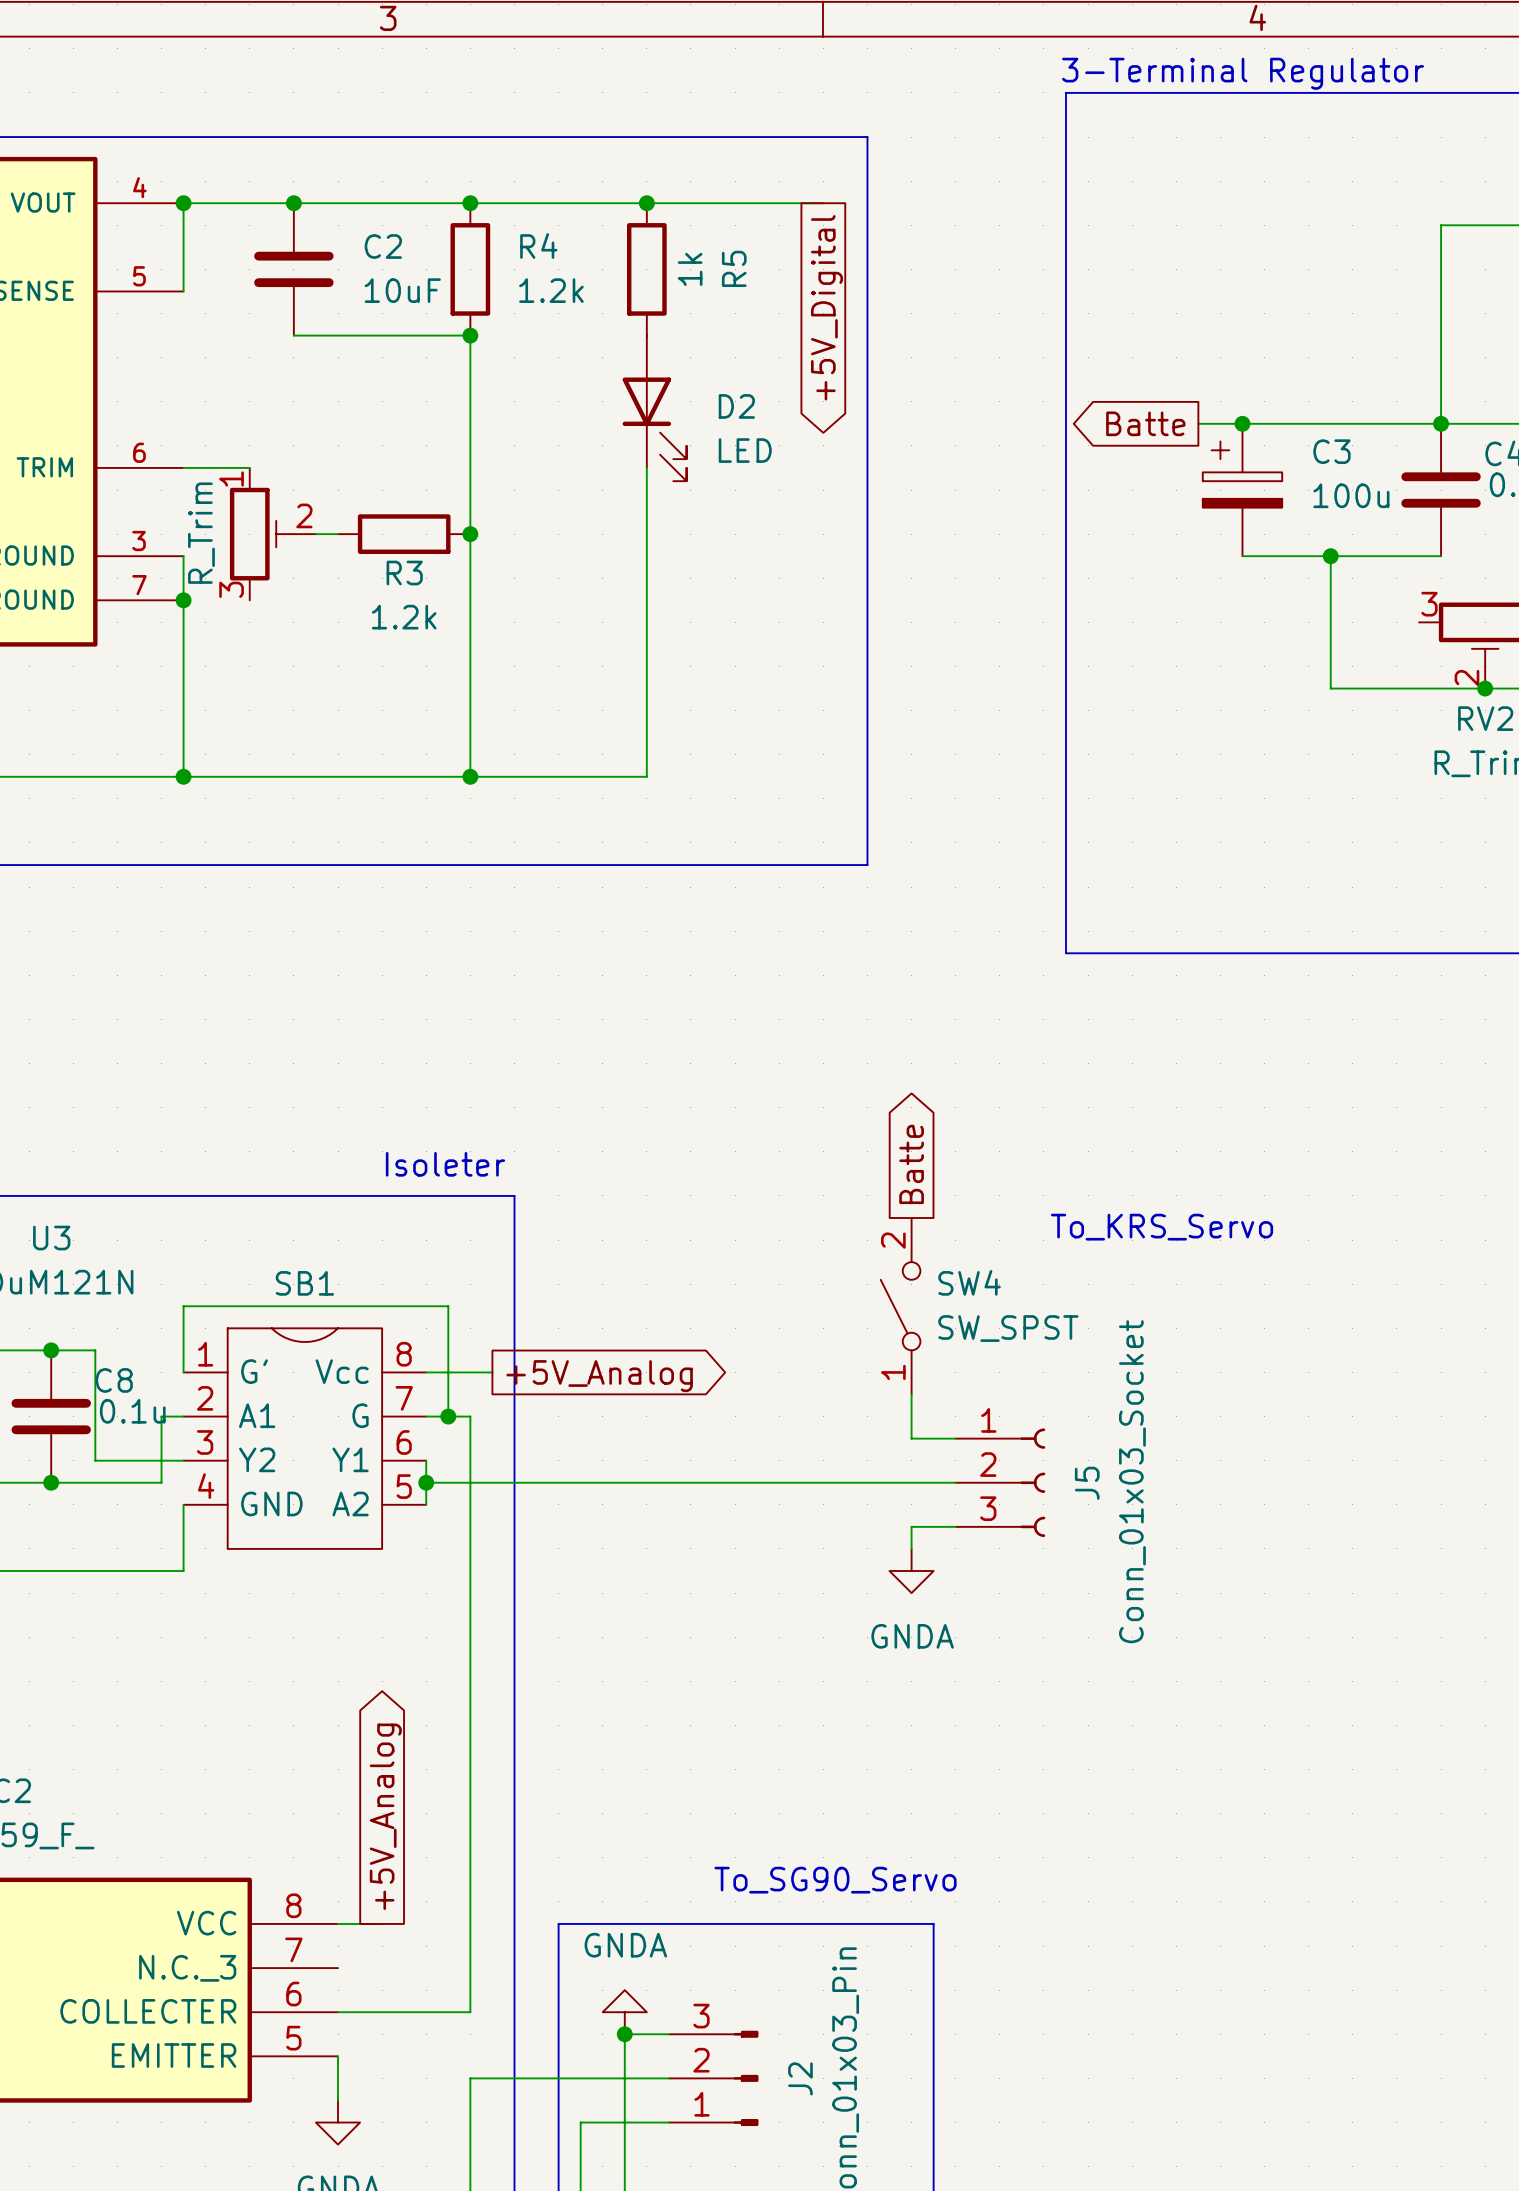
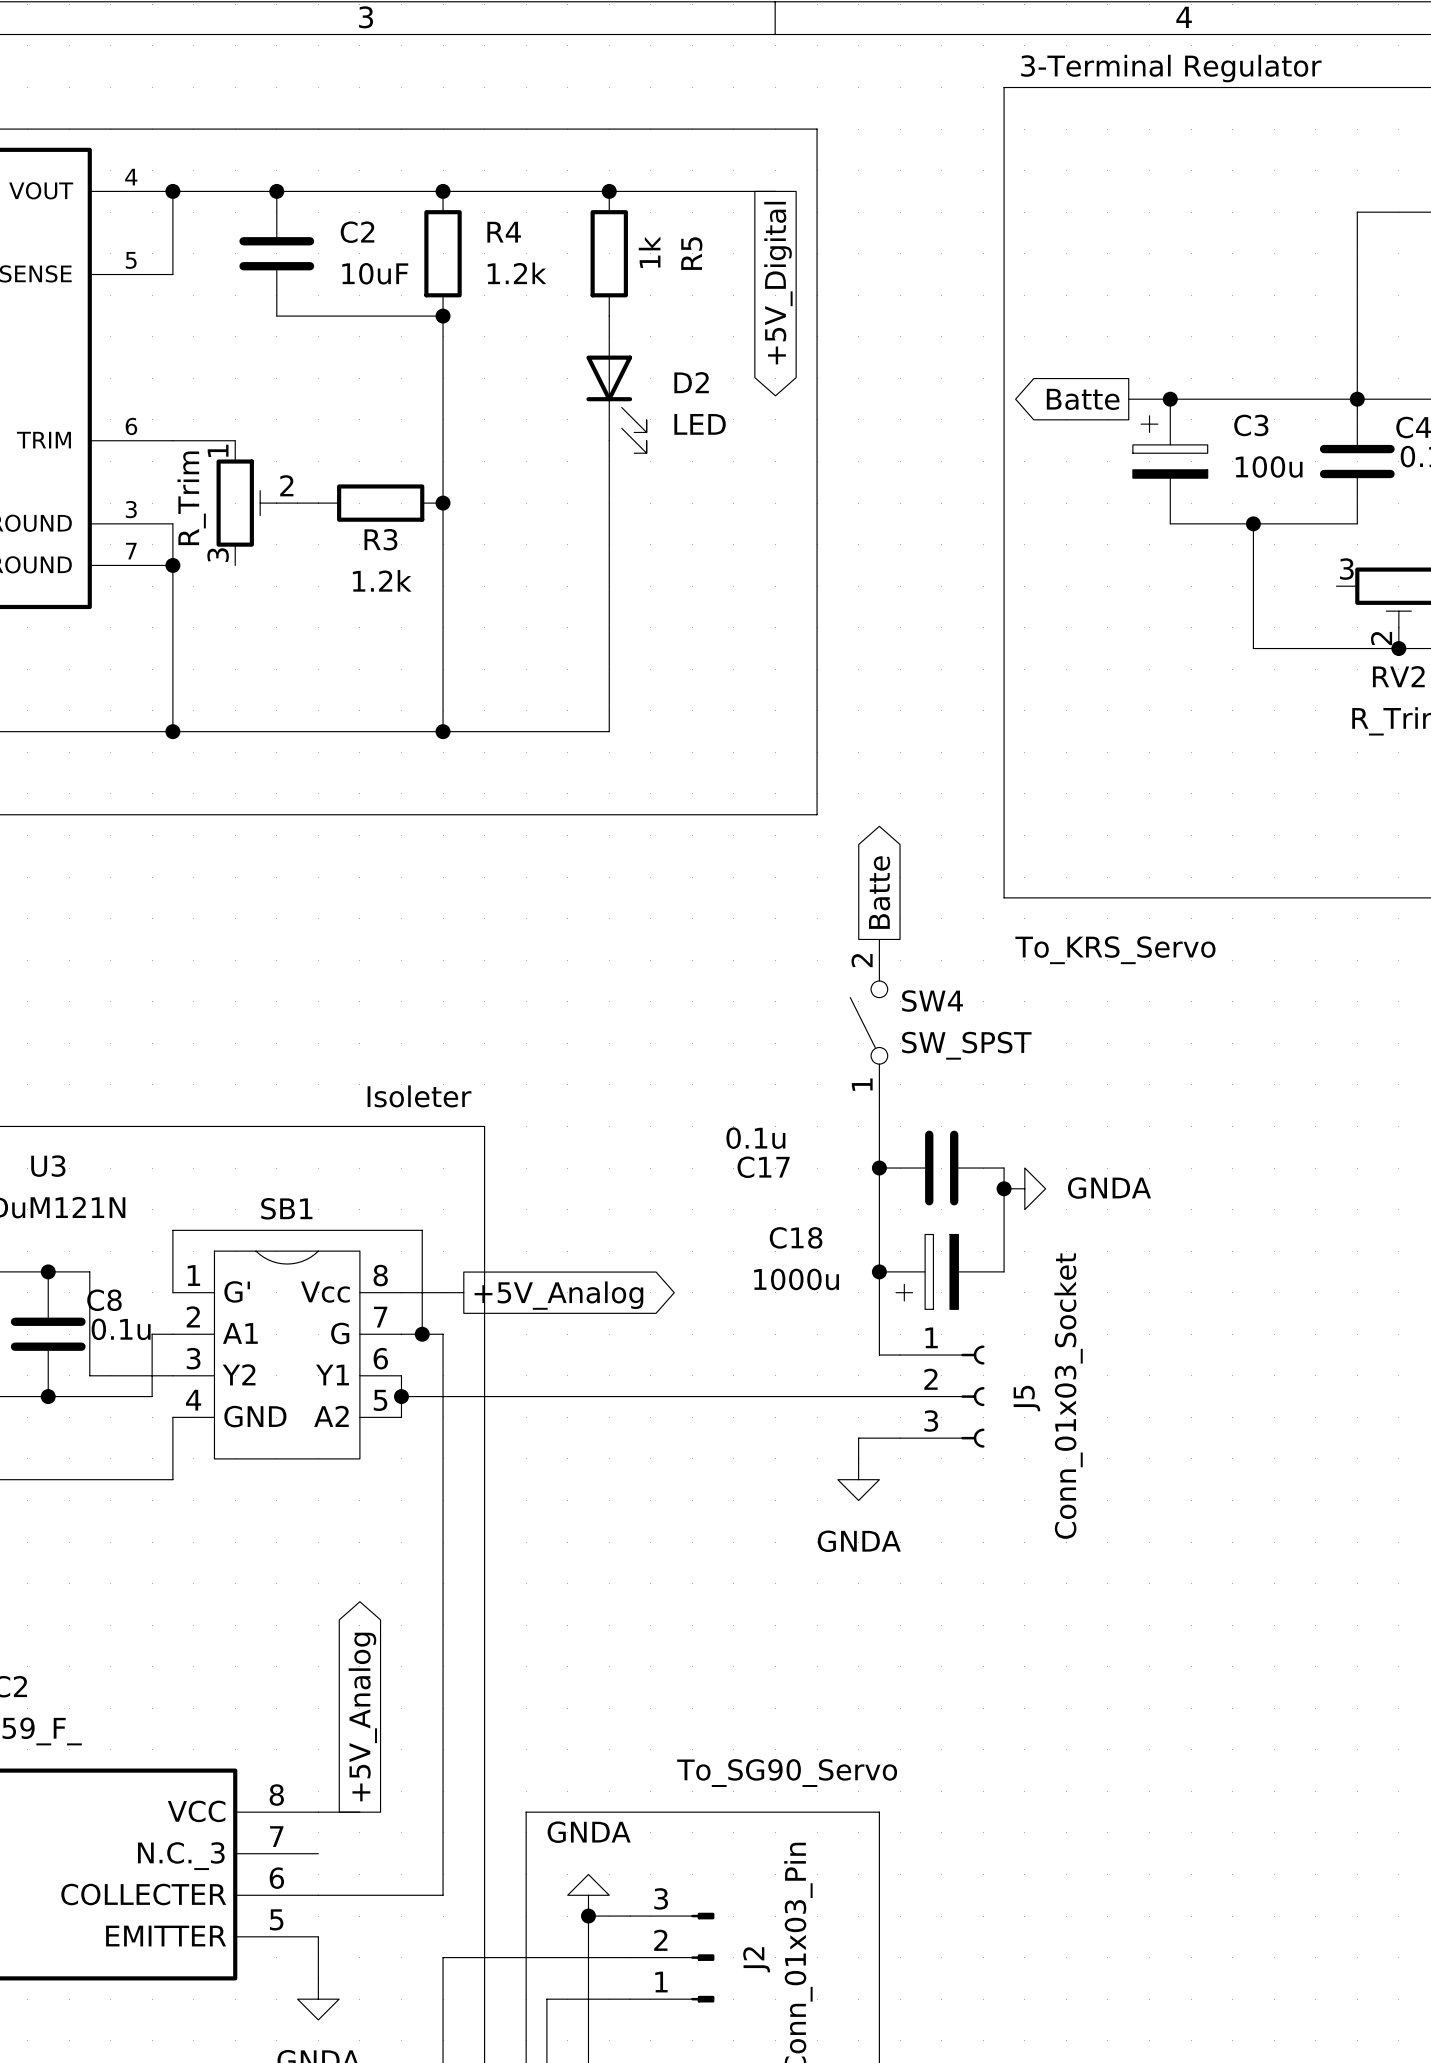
global label position: Batte (911, 1164) -> Batte (879, 892)
text position: To_KRS_Servo (1162, 1227) -> To_KRS_Servo (1115, 950)
junction: none -> (879, 1168)
C17: none -> 0.1u (941, 1168)
wire: none -> (1004, 1168) (1004, 1271)
junction: none -> (1004, 1188)
power symbol: none -> GNDA (1024, 1188)
SW4 position: (900, 1306) -> (868, 1022)
junction: none -> (879, 1271)
C18: none -> 1000u (941, 1271)
wire: (911, 1394) (911, 1438) (933, 1438) -> (879, 1105) (879, 1355)

